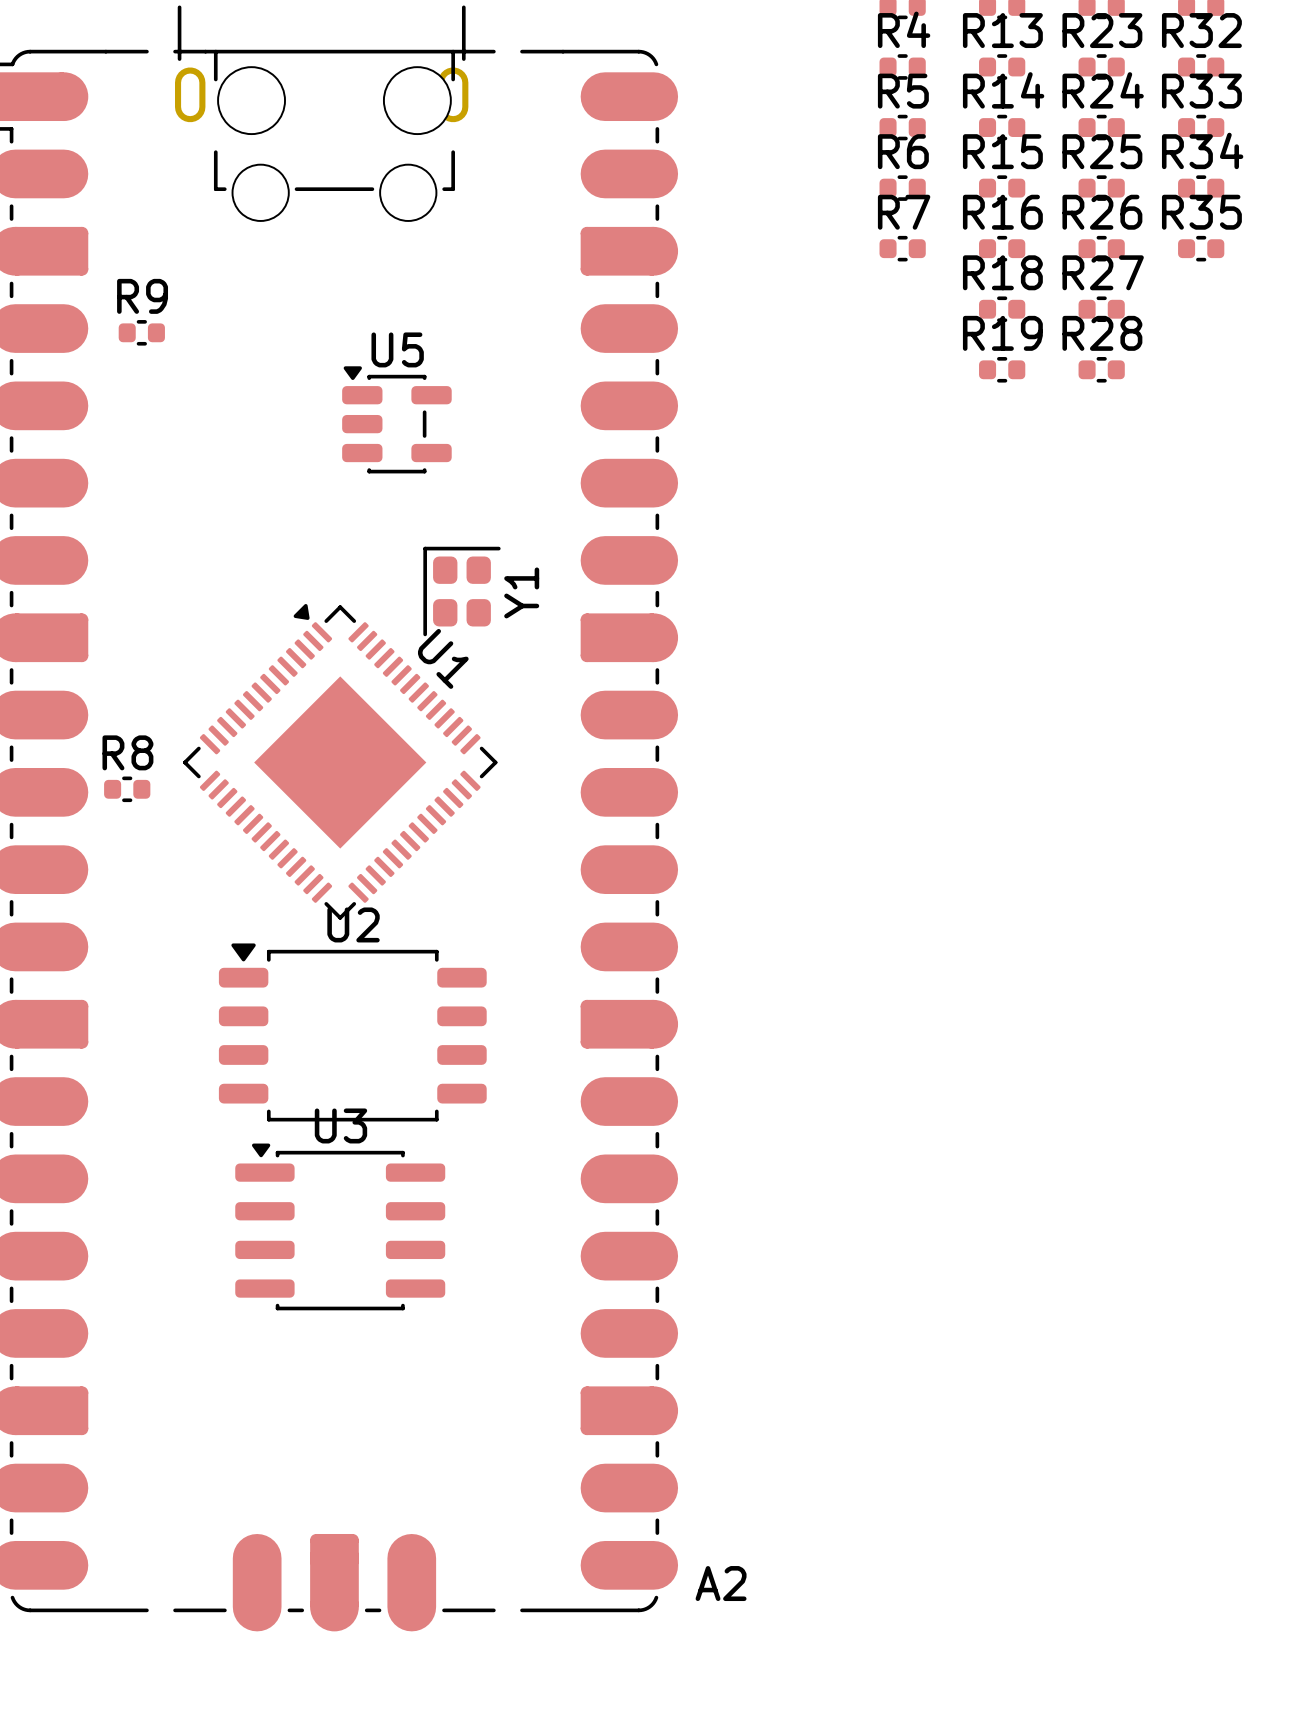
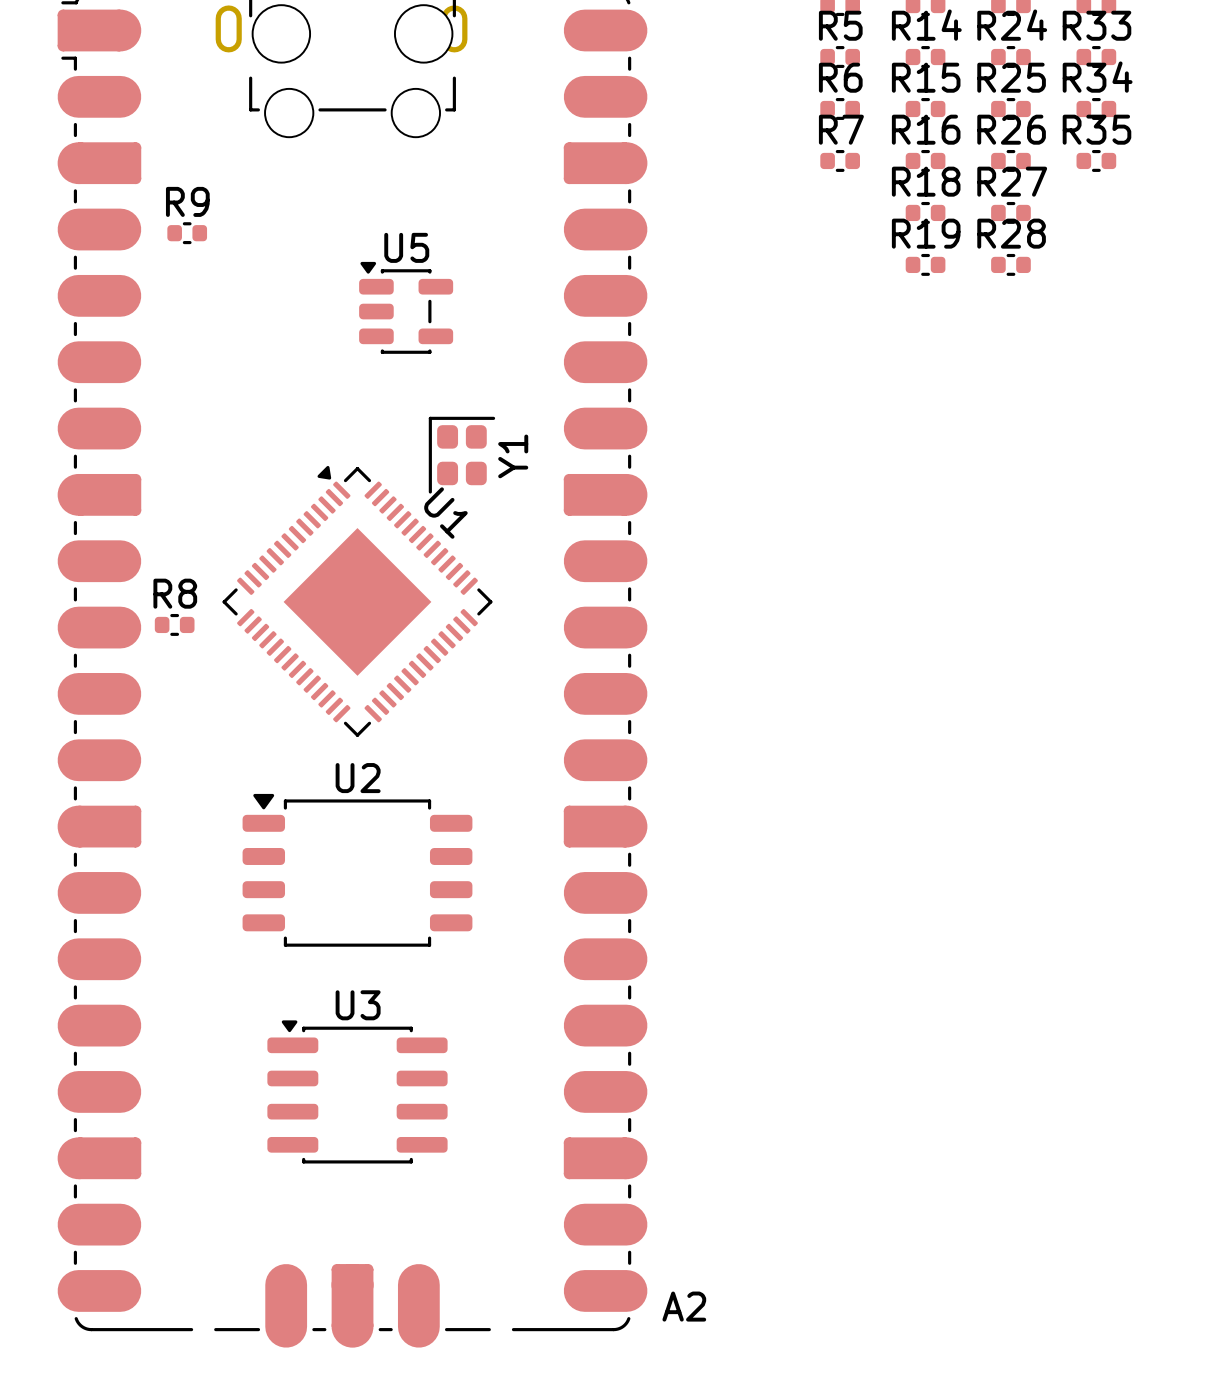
U2 position: (352, 1032) -> (357, 870)
U3 position: (340, 1226) -> (357, 1091)

